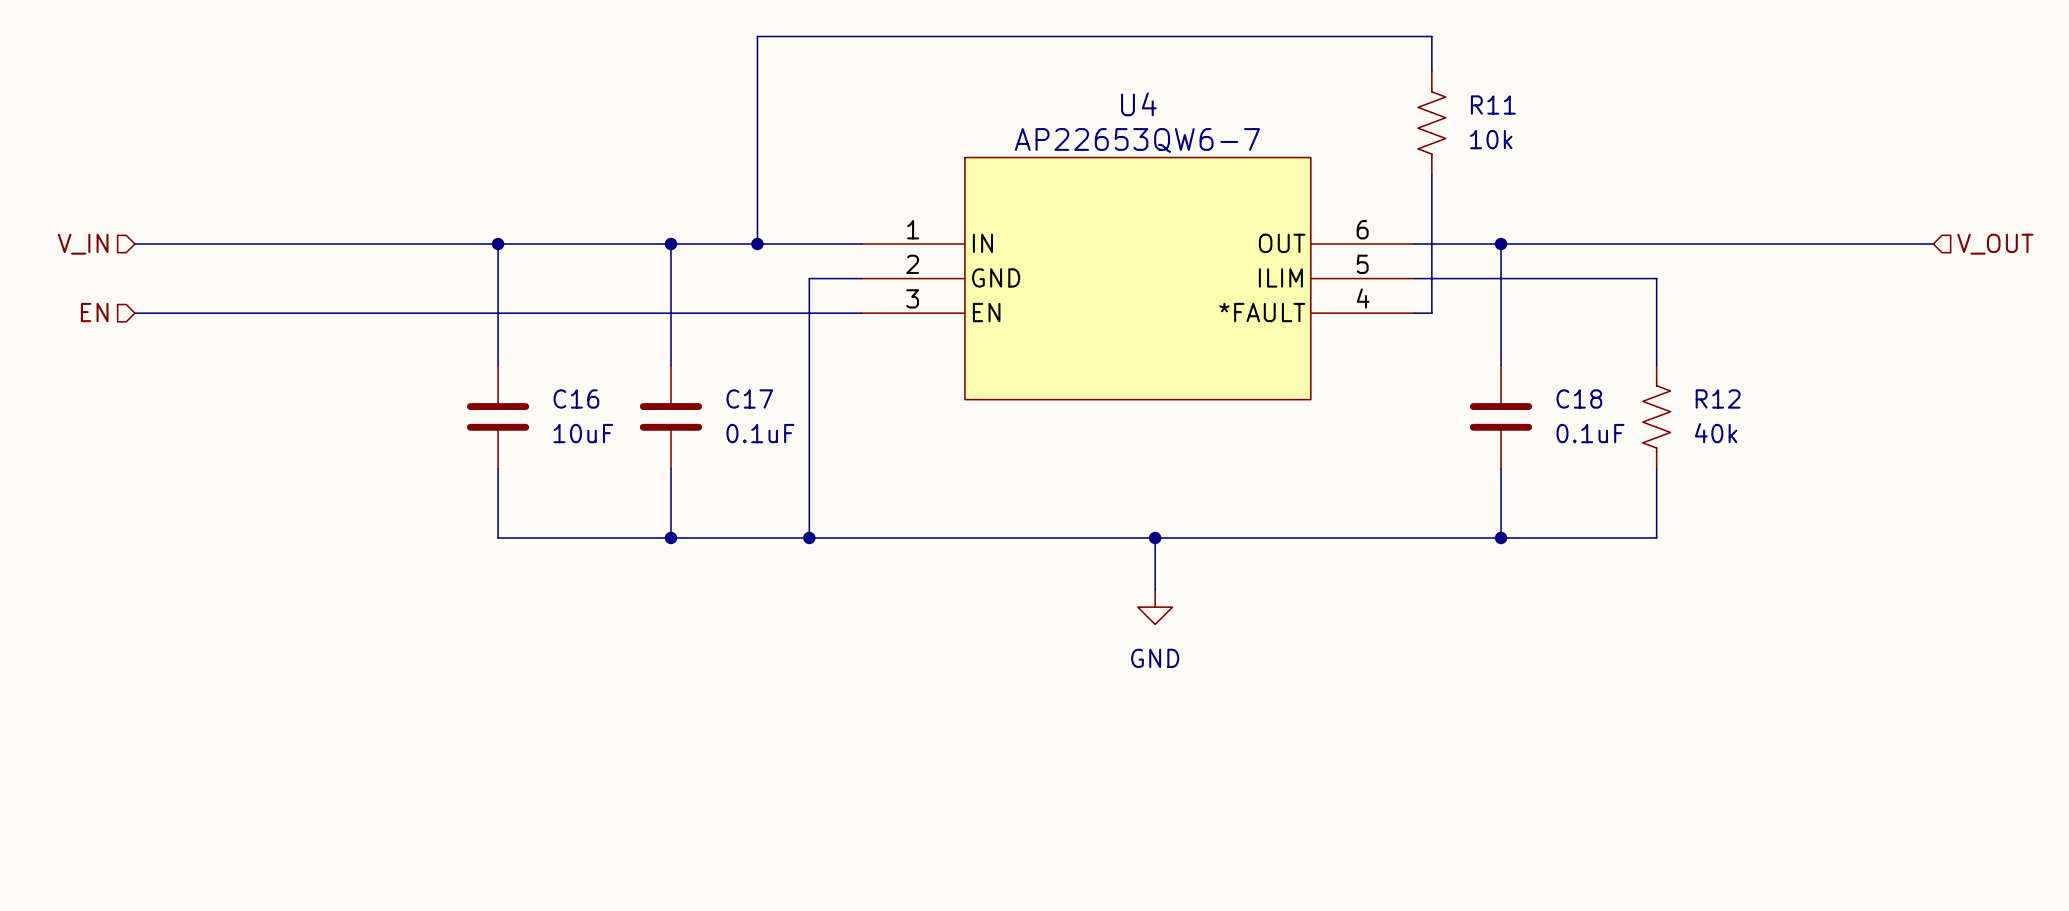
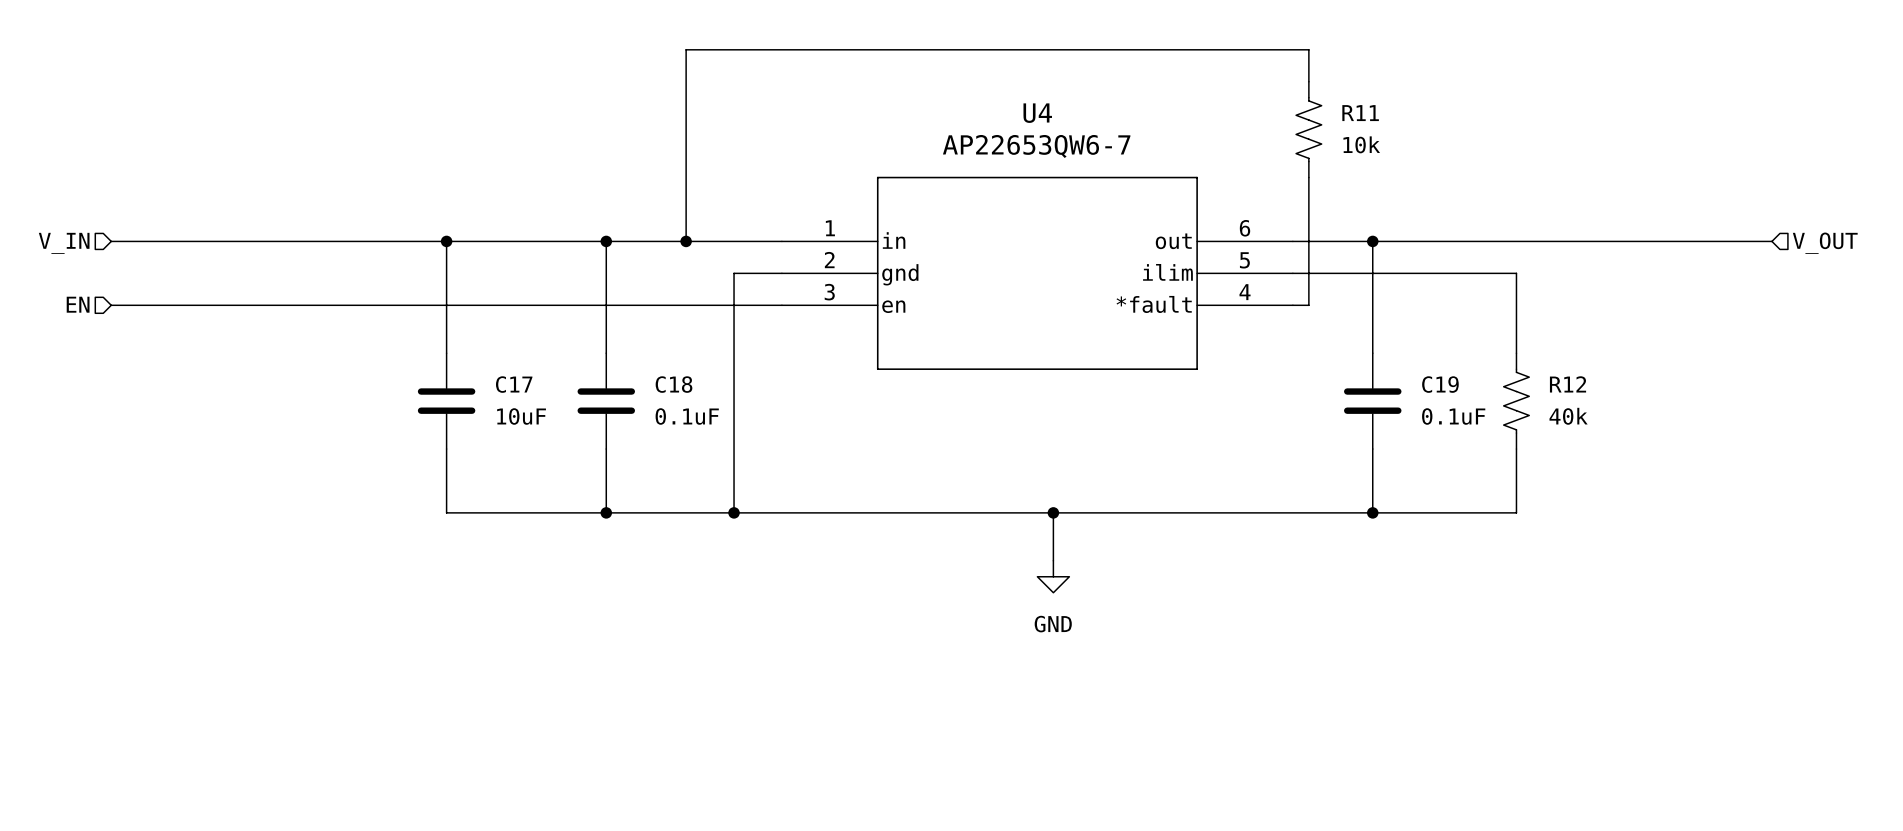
U4 symbol: [861, 157, 1415, 400] -> [781, 176, 1293, 370]
C16 name: C16 (576, 398) -> C17 (514, 384)
C17 name: C17 (749, 398) -> C18 (674, 384)
C18 name: C18 (1579, 398) -> C19 (1440, 384)

